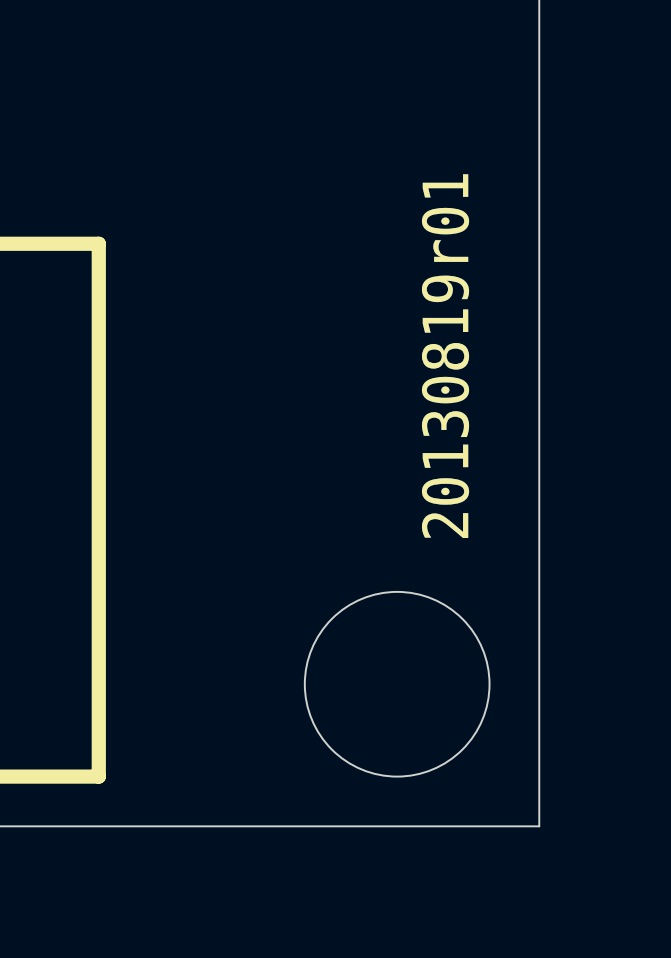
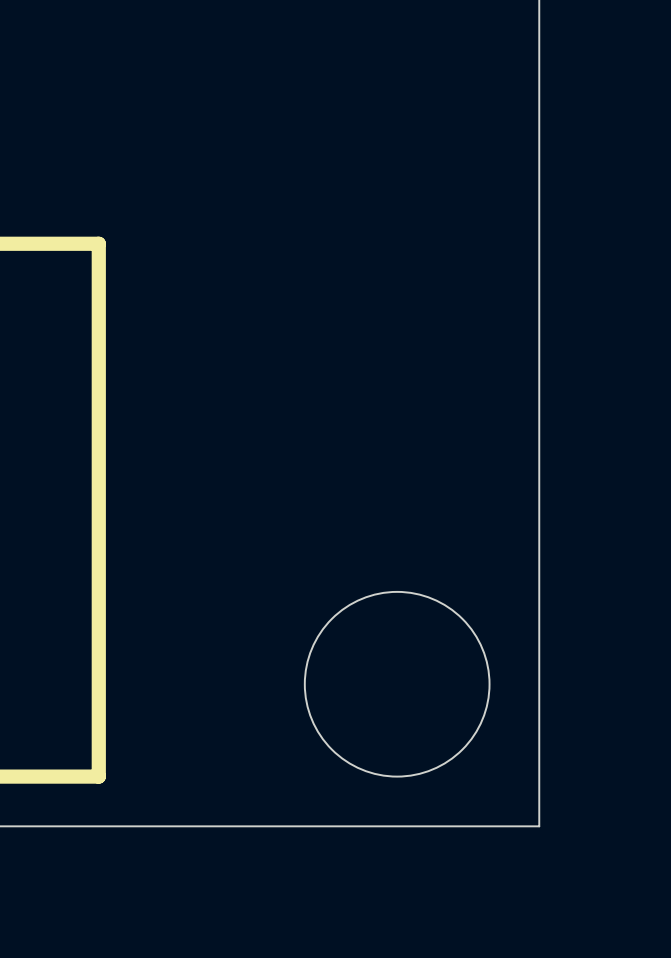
text: 20130819r01 (445, 356) -> none

